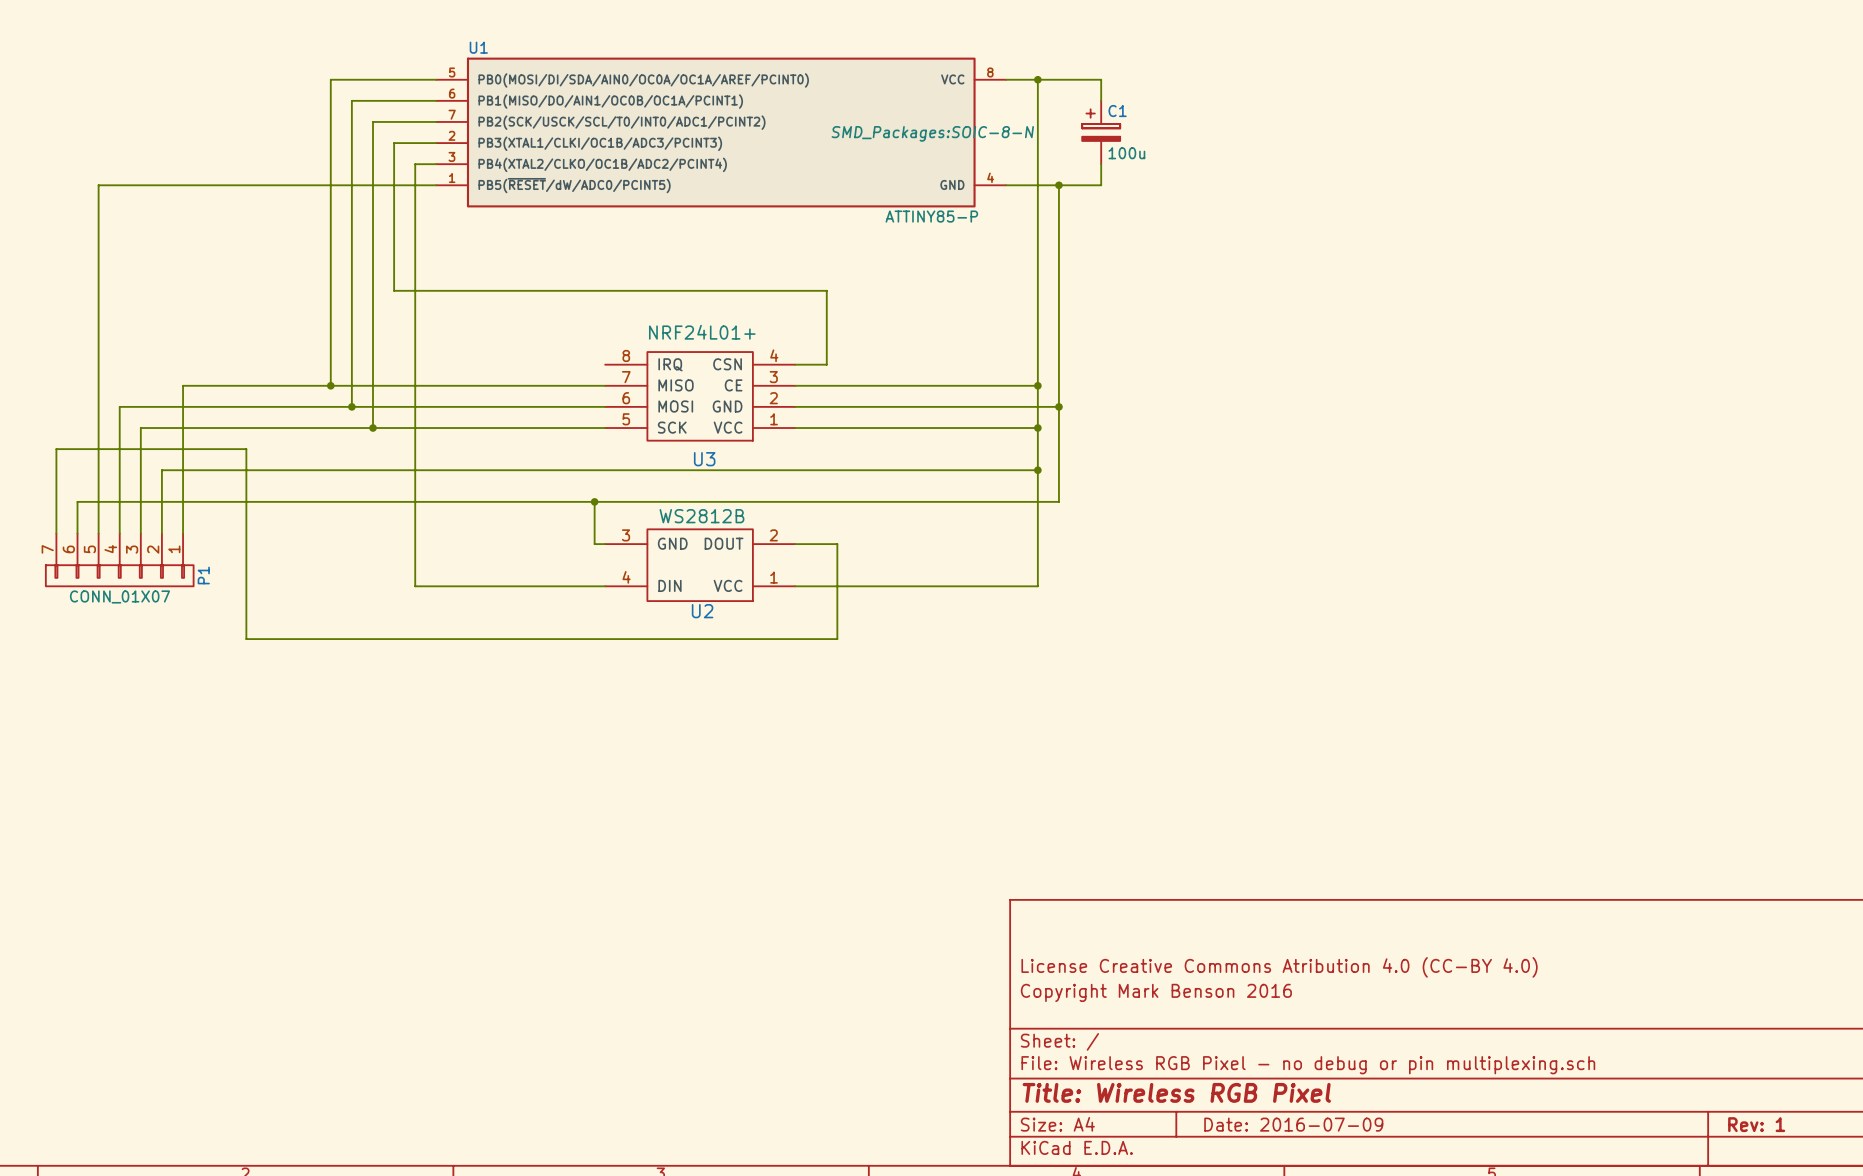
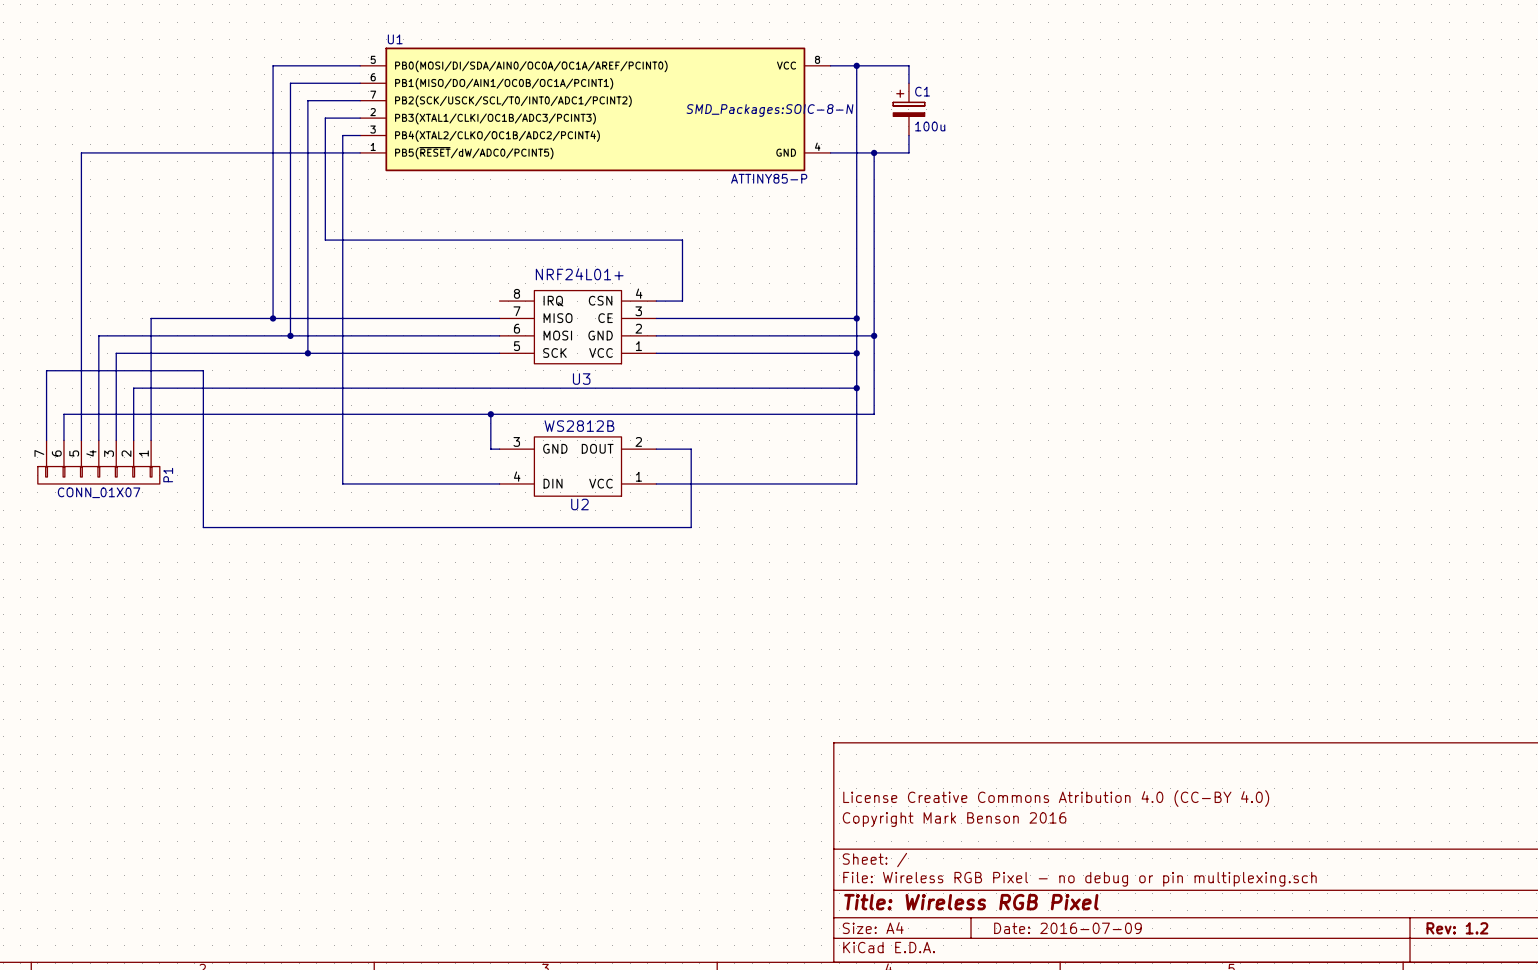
title block: Rev: 1 (1756, 1124) -> Rev: 1.2 (1457, 928)

